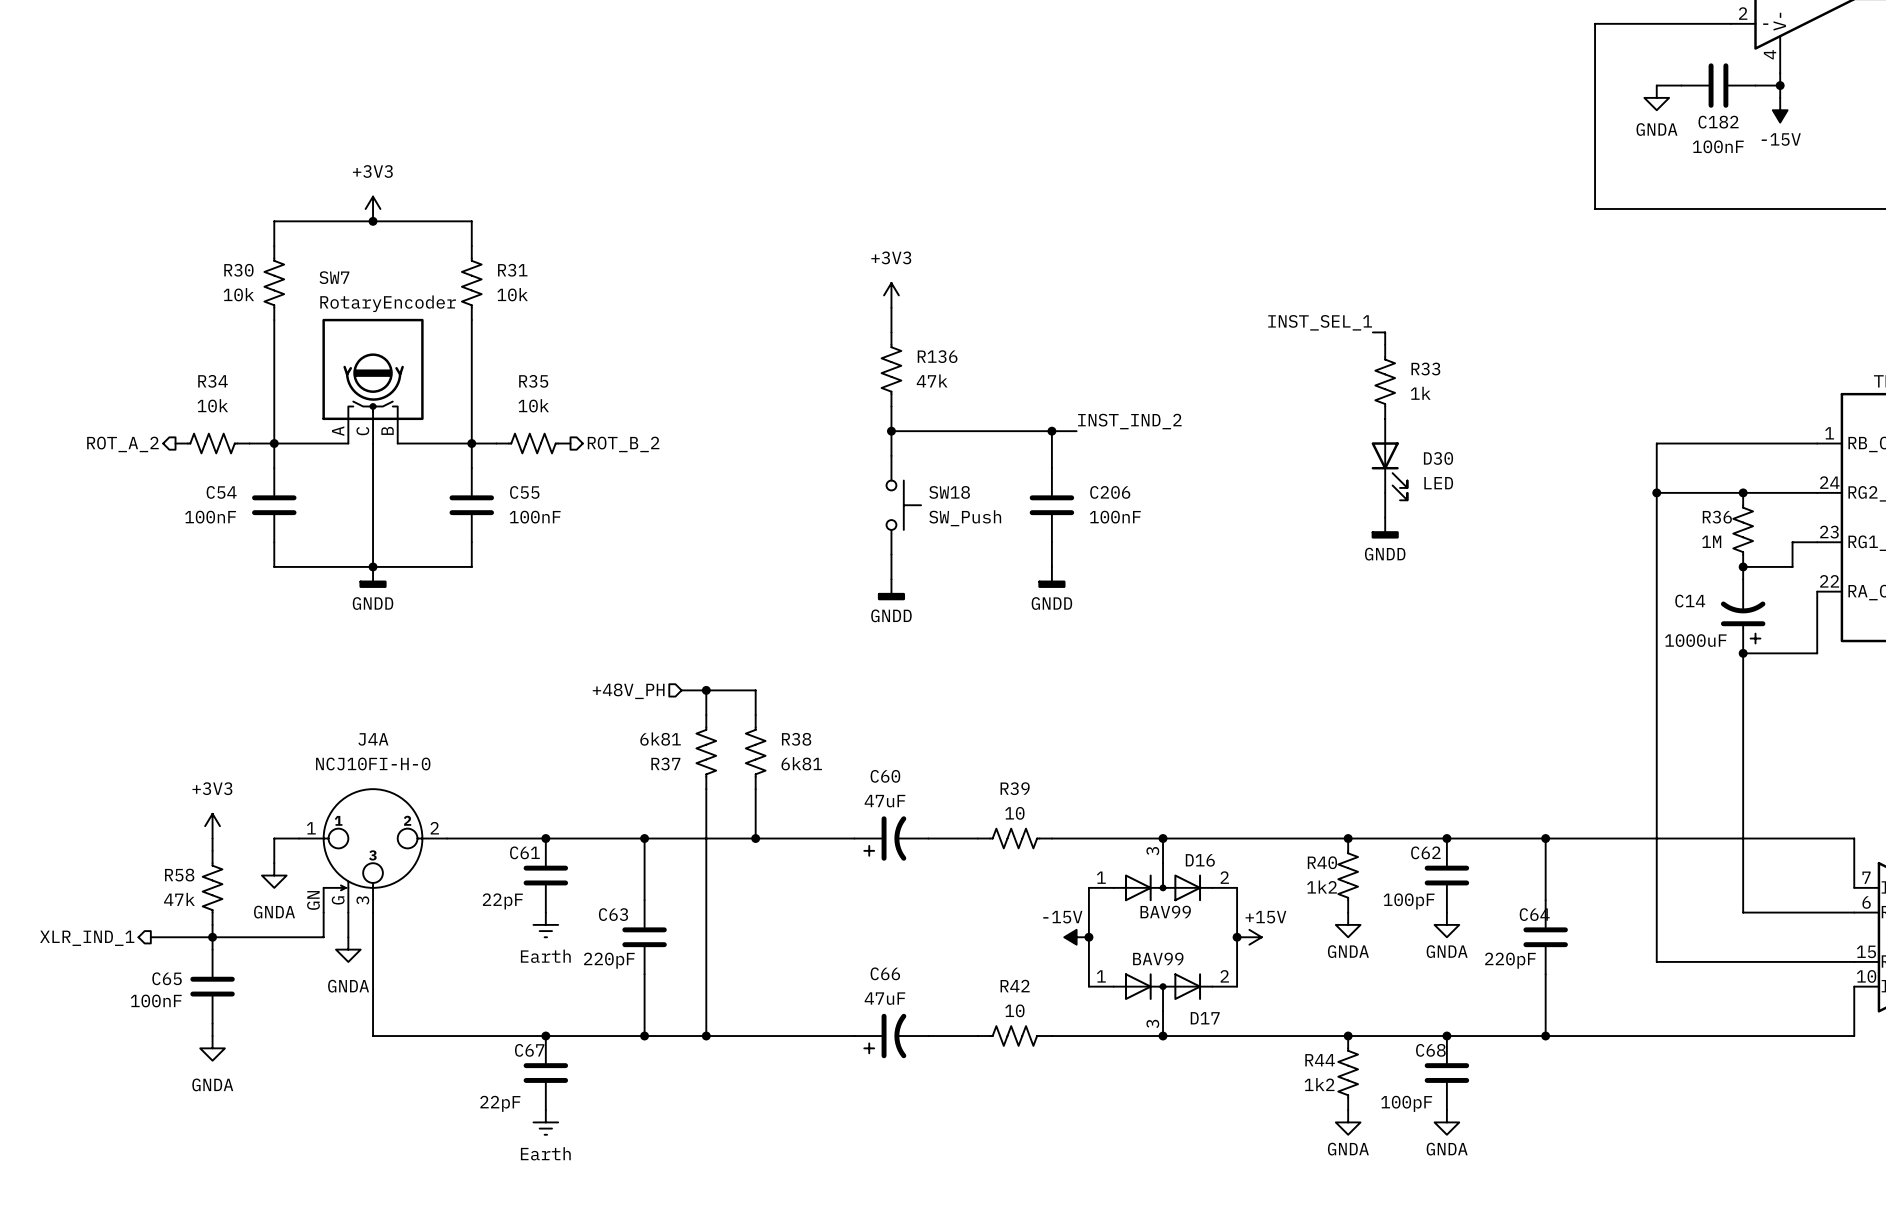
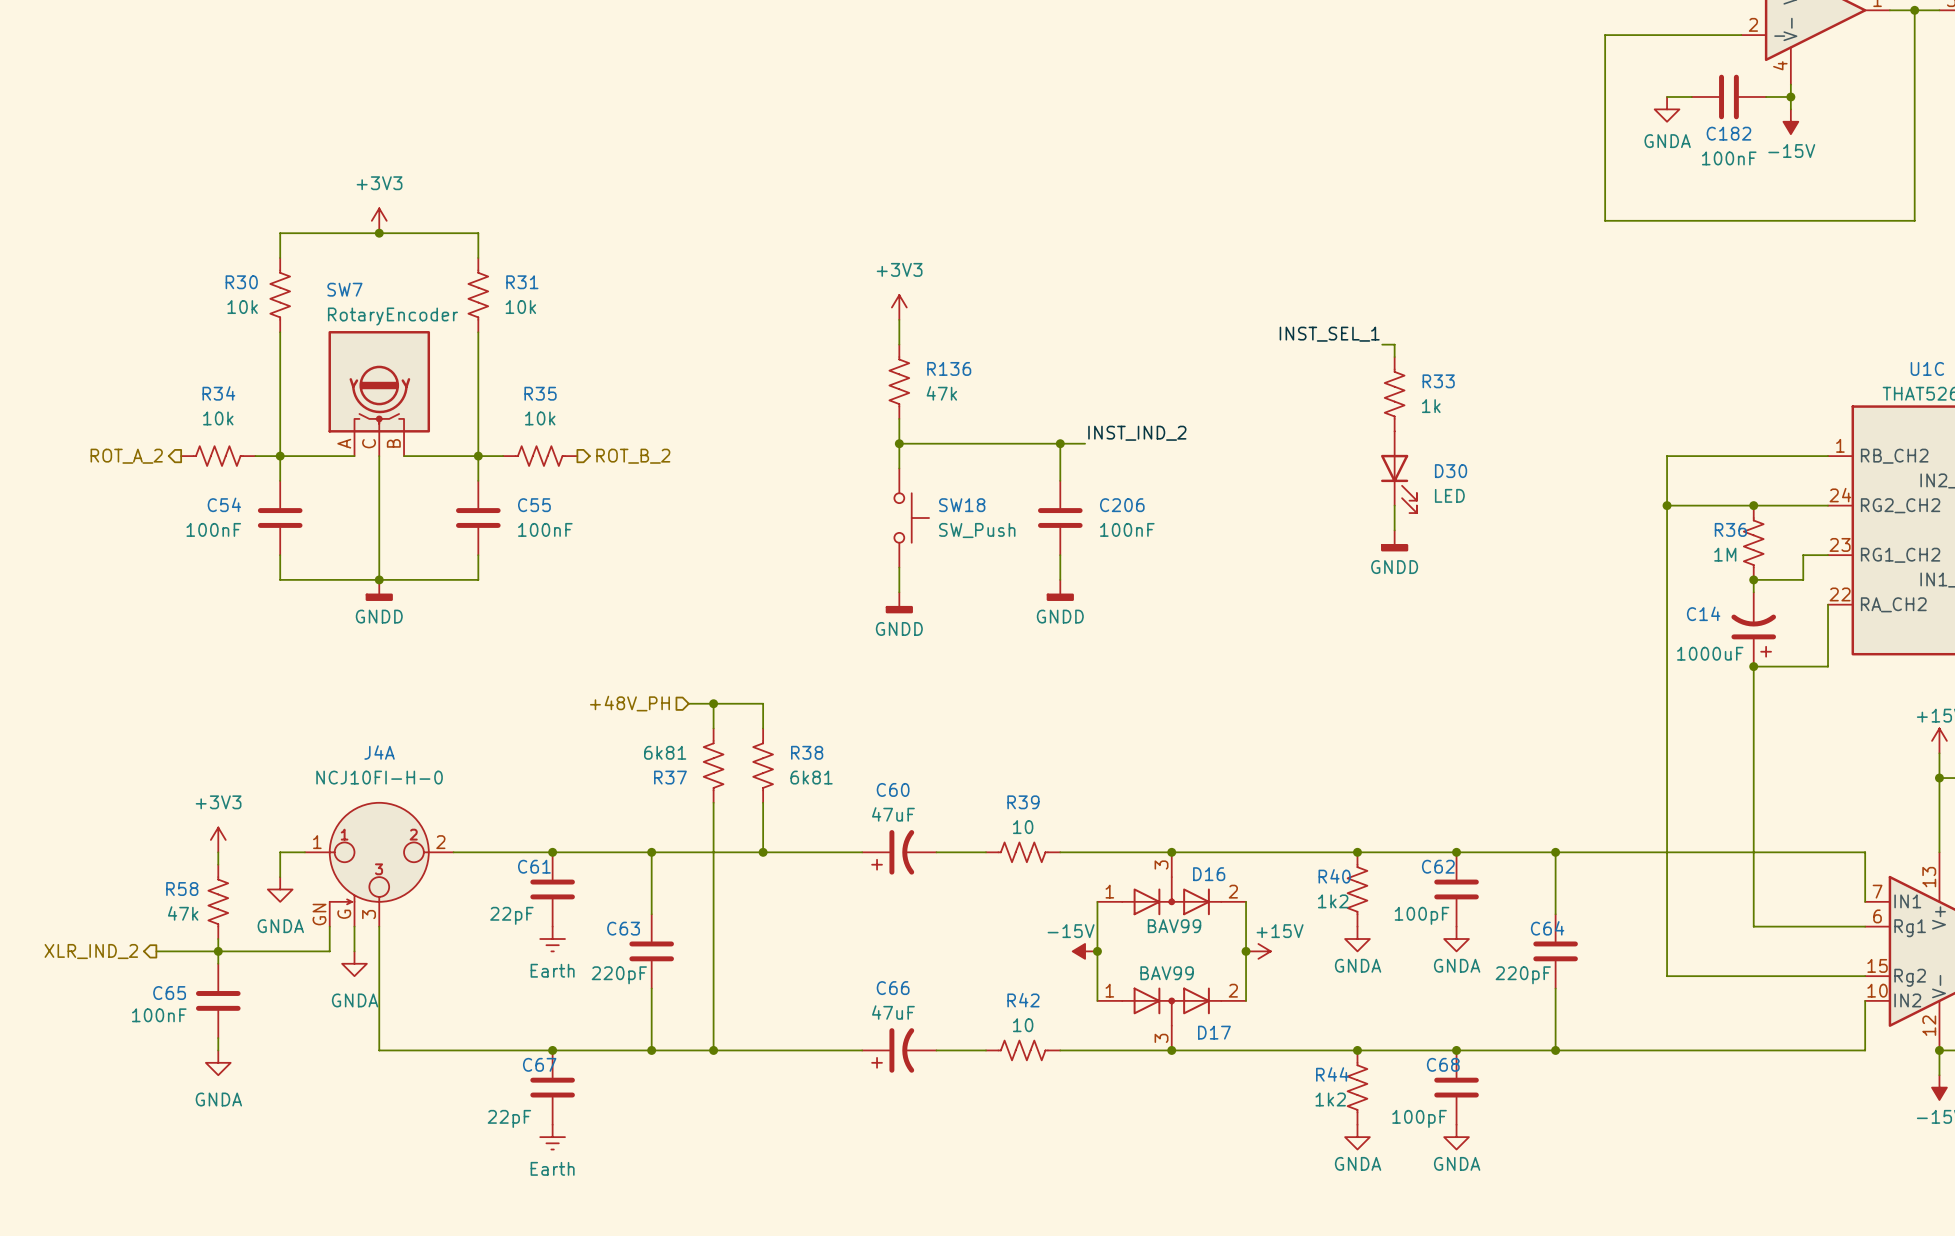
hierarchical label: XLR_IND_1 (87, 938) -> XLR_IND_2 (91, 951)

